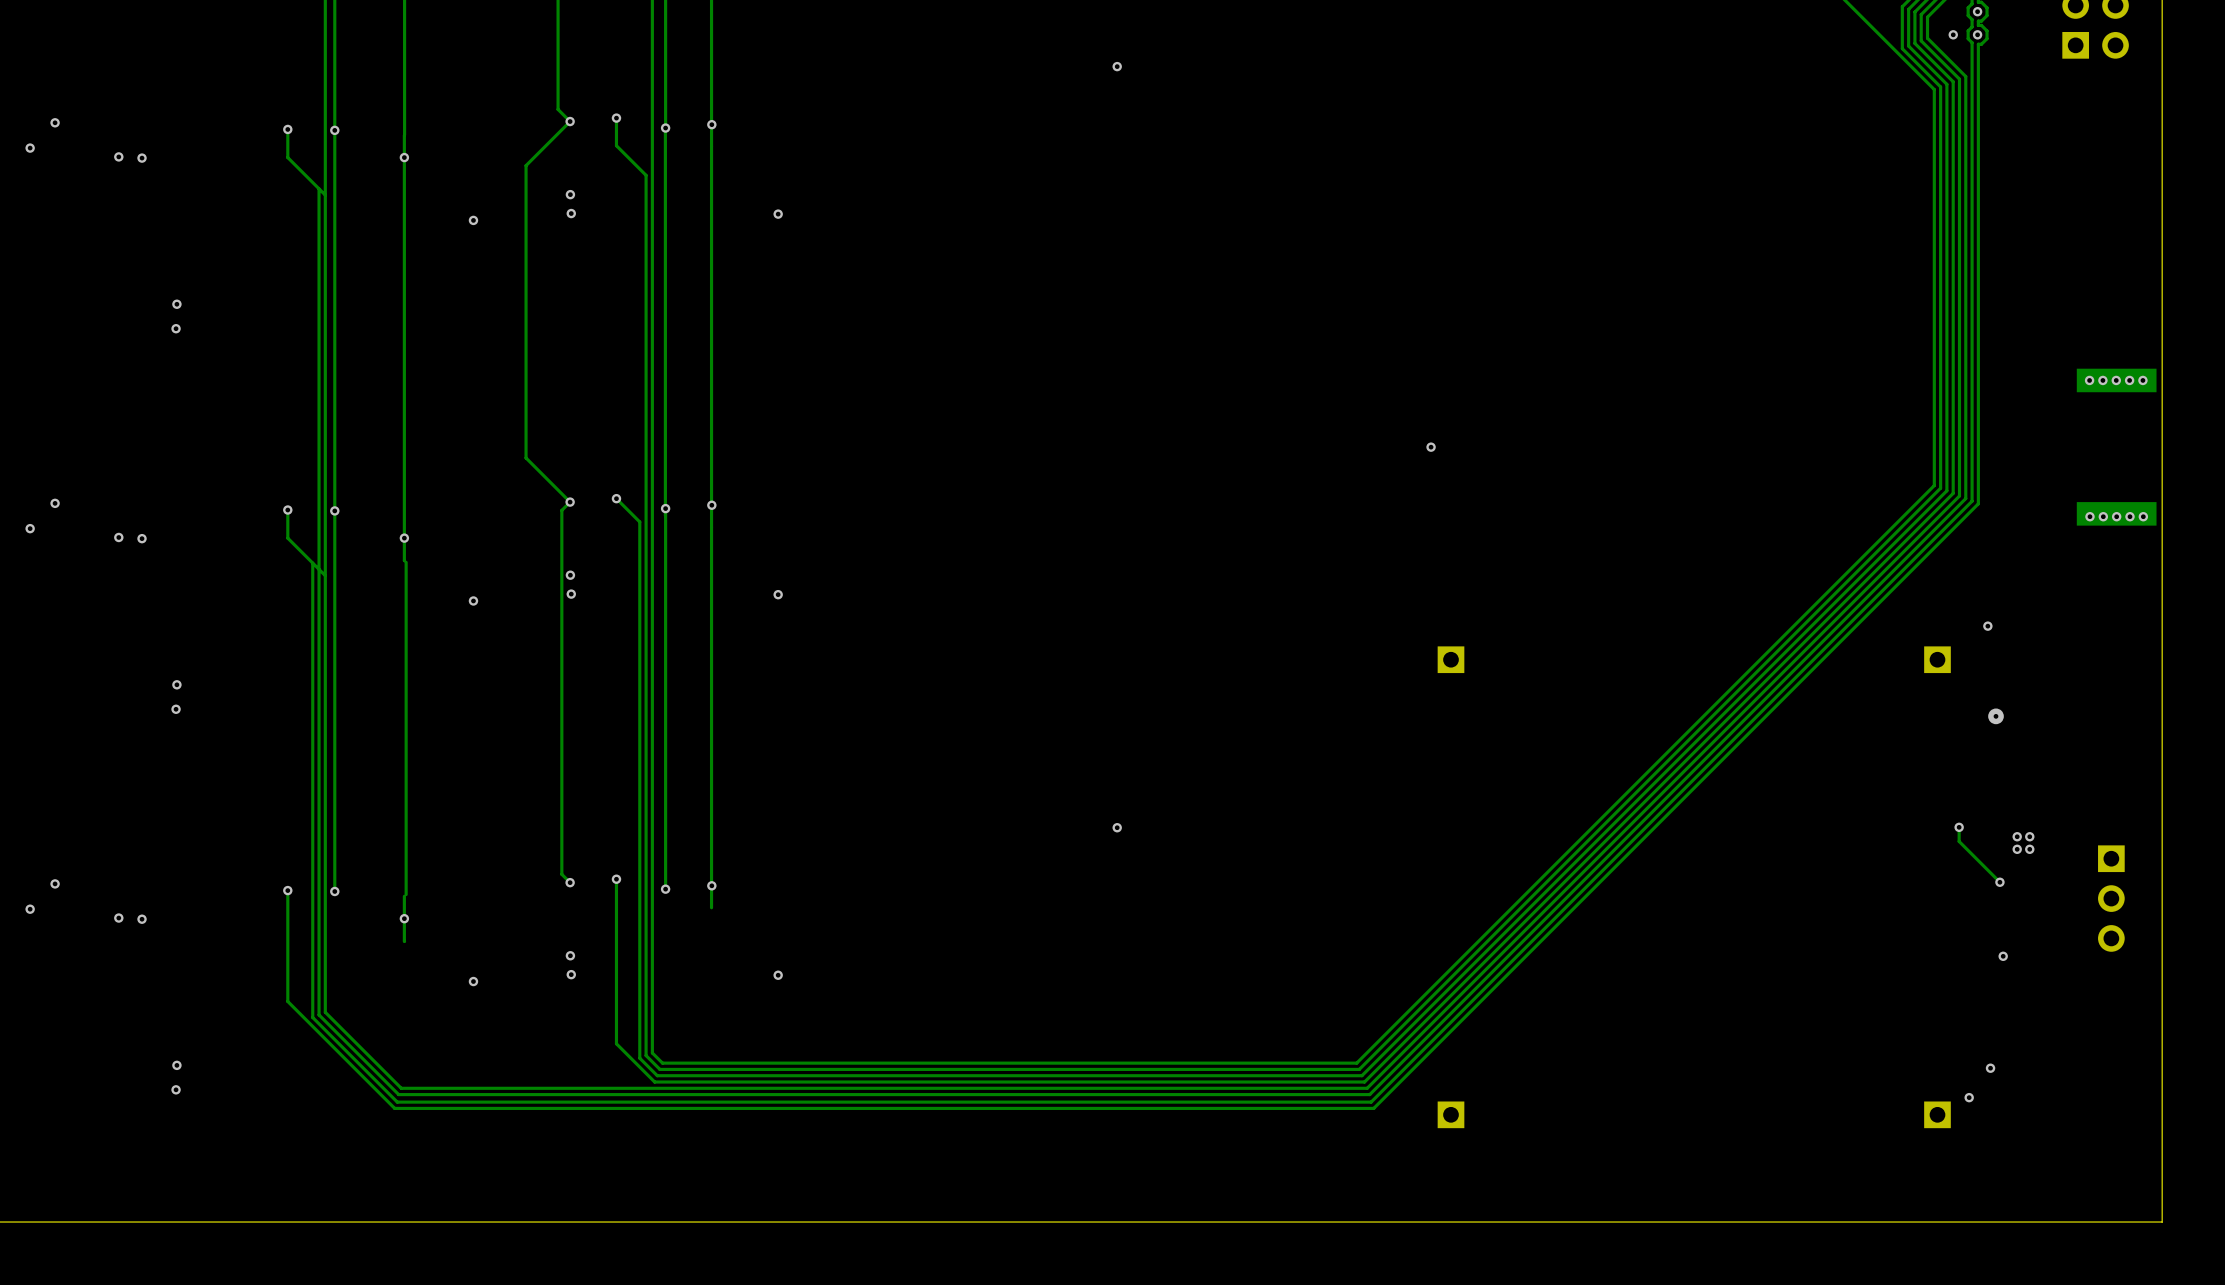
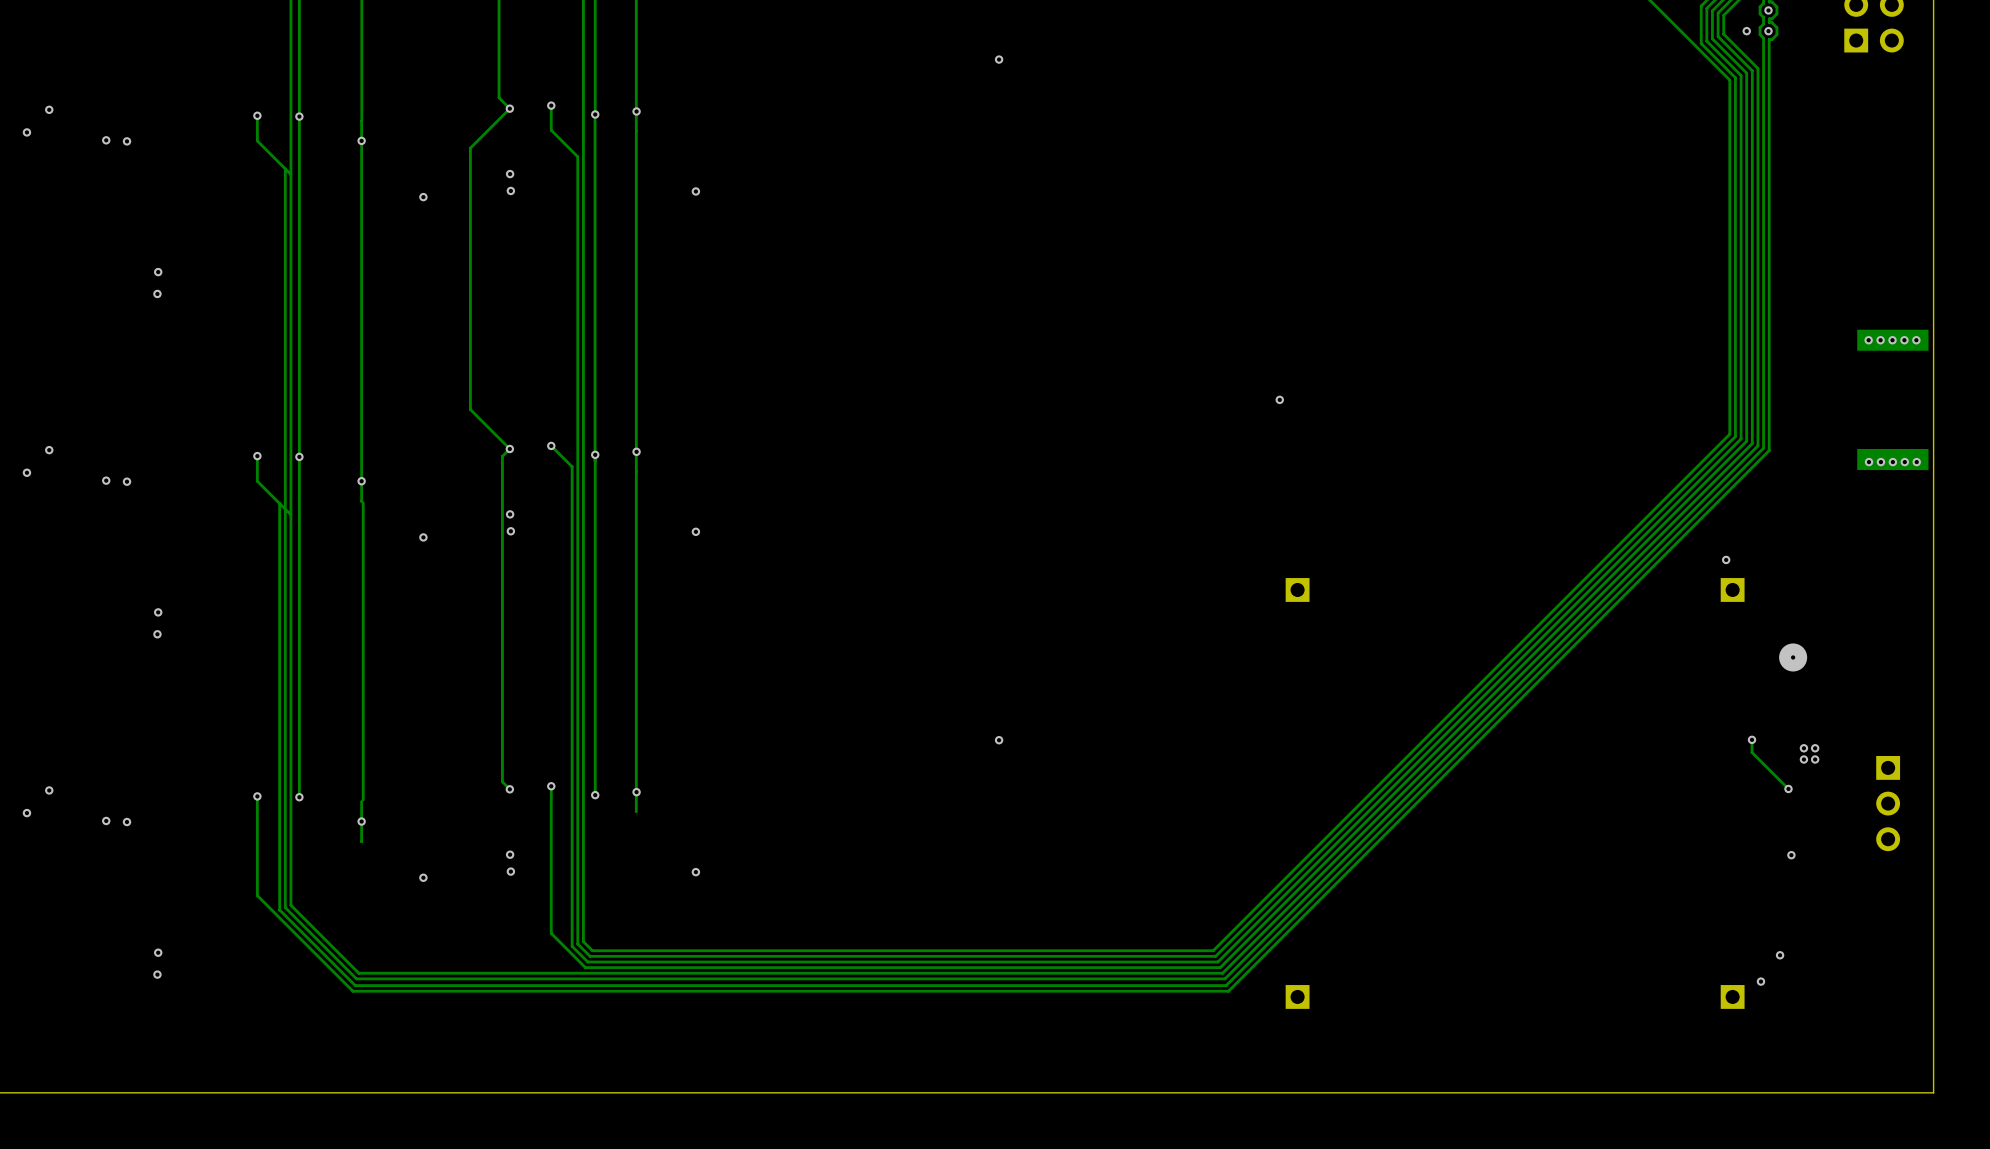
via position: (1987, 626) -> (1726, 559)
via: (1996, 716) -> none
via: none -> (1793, 657)

